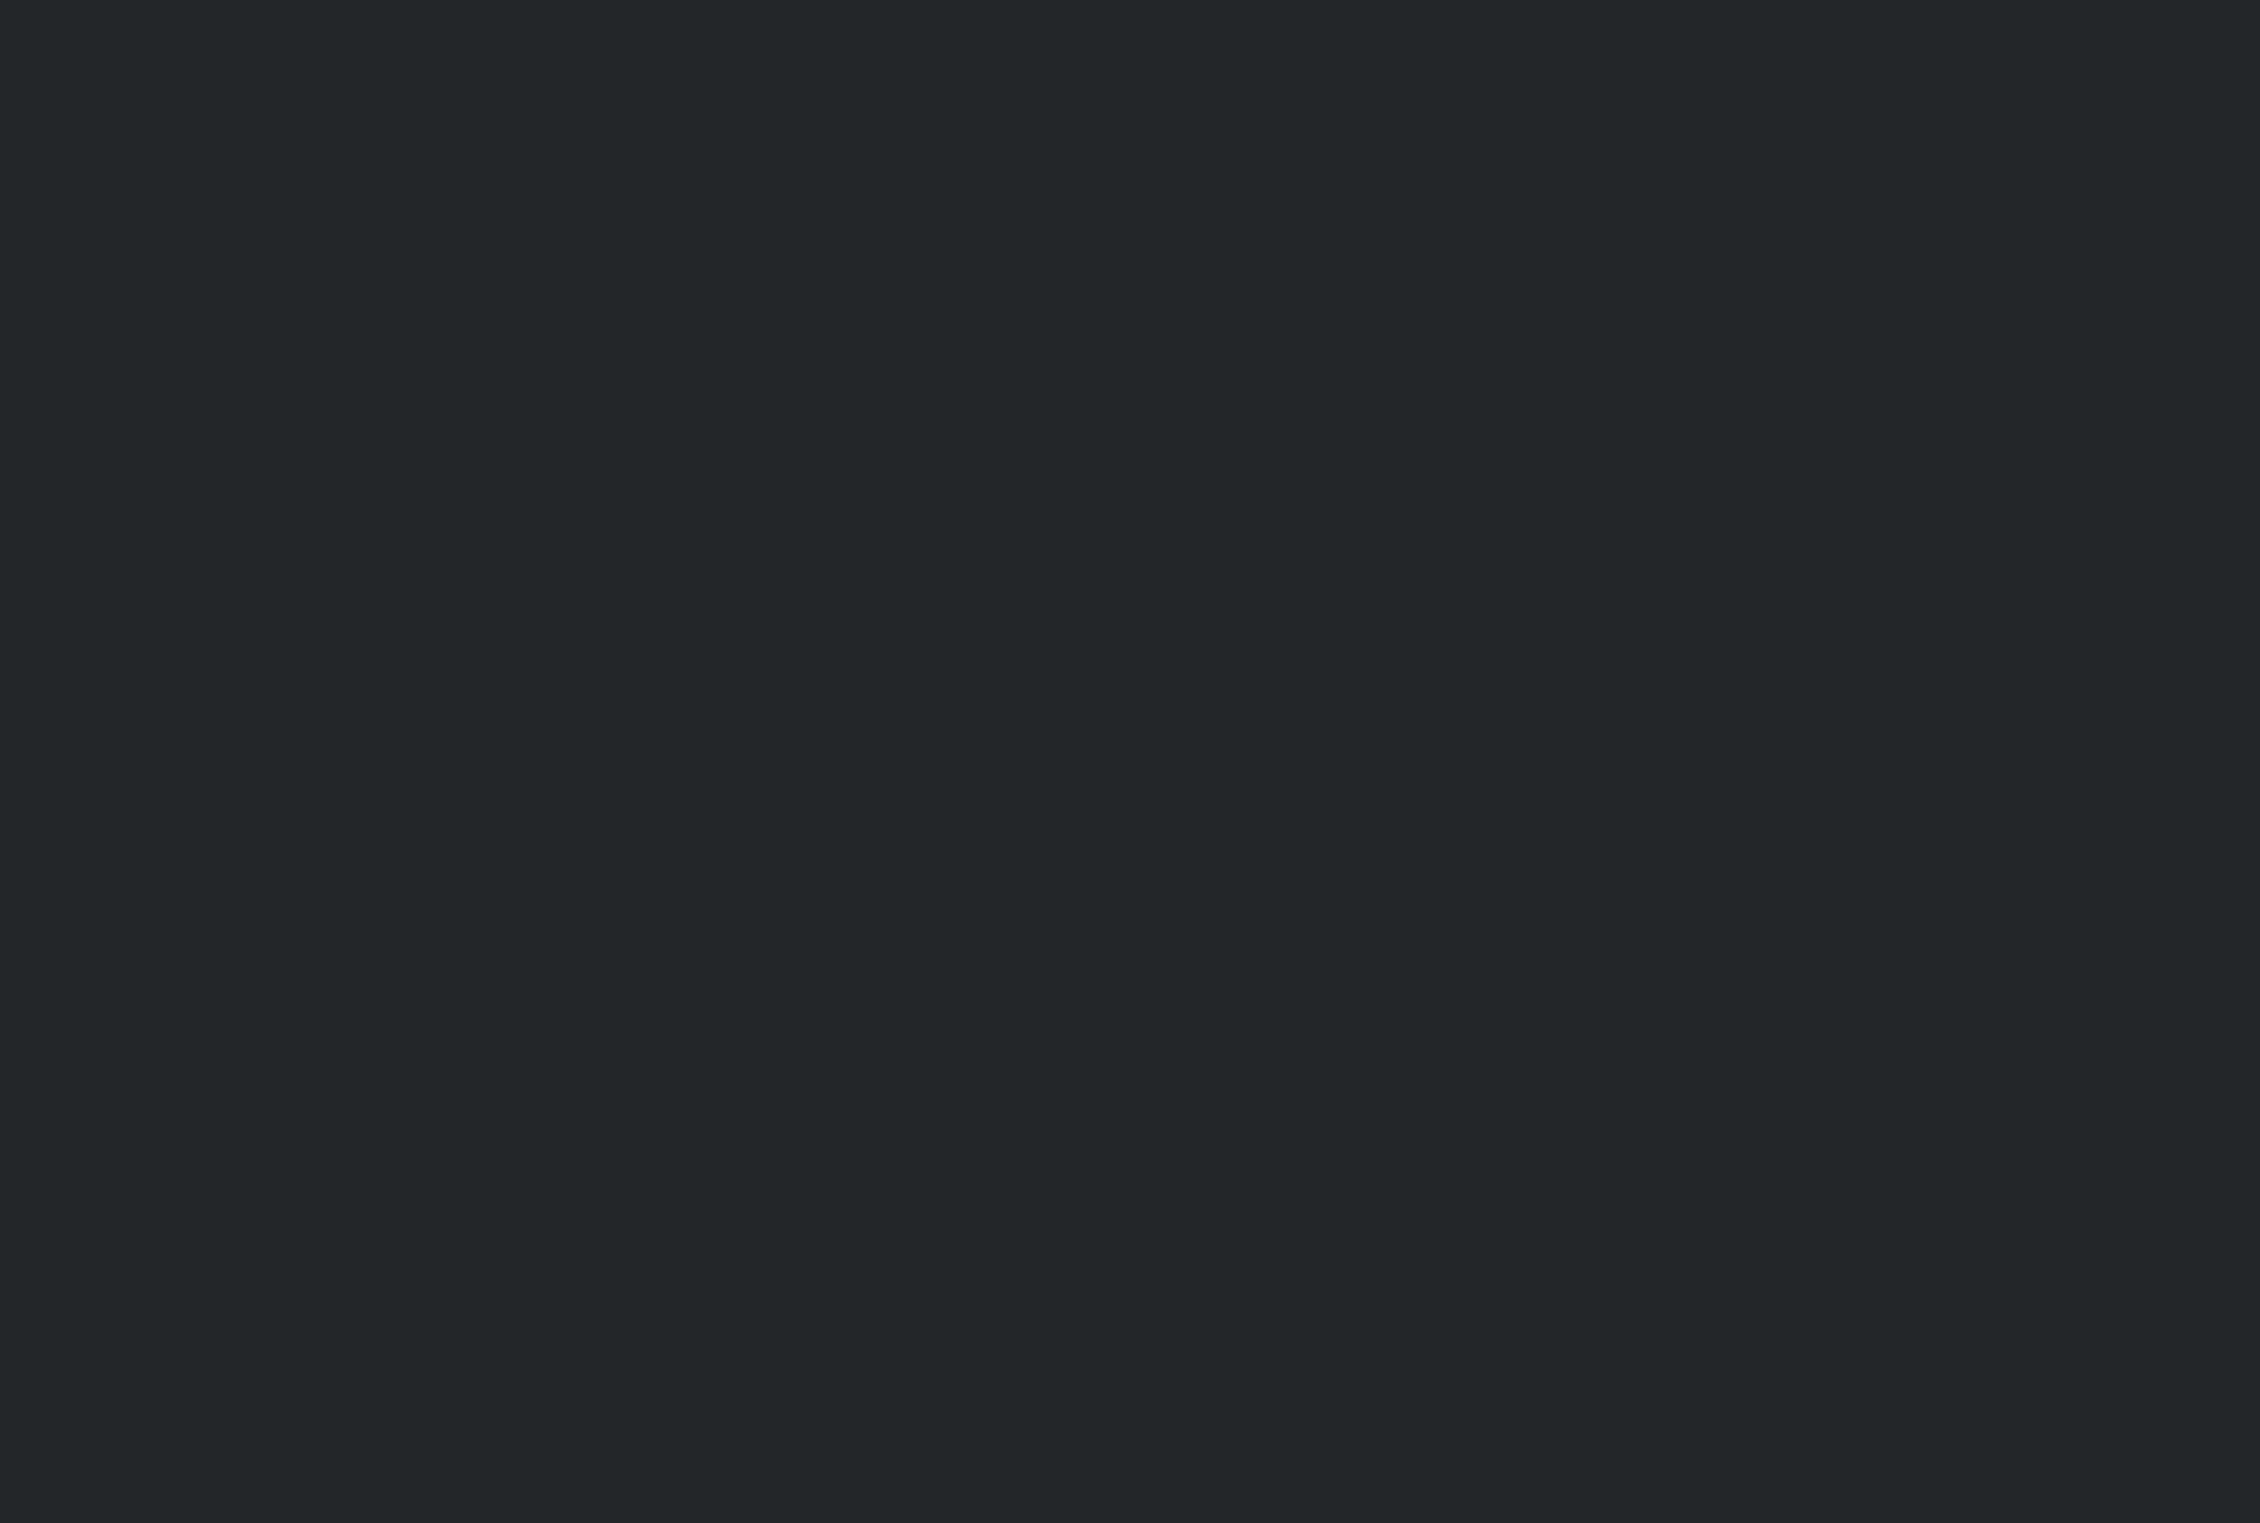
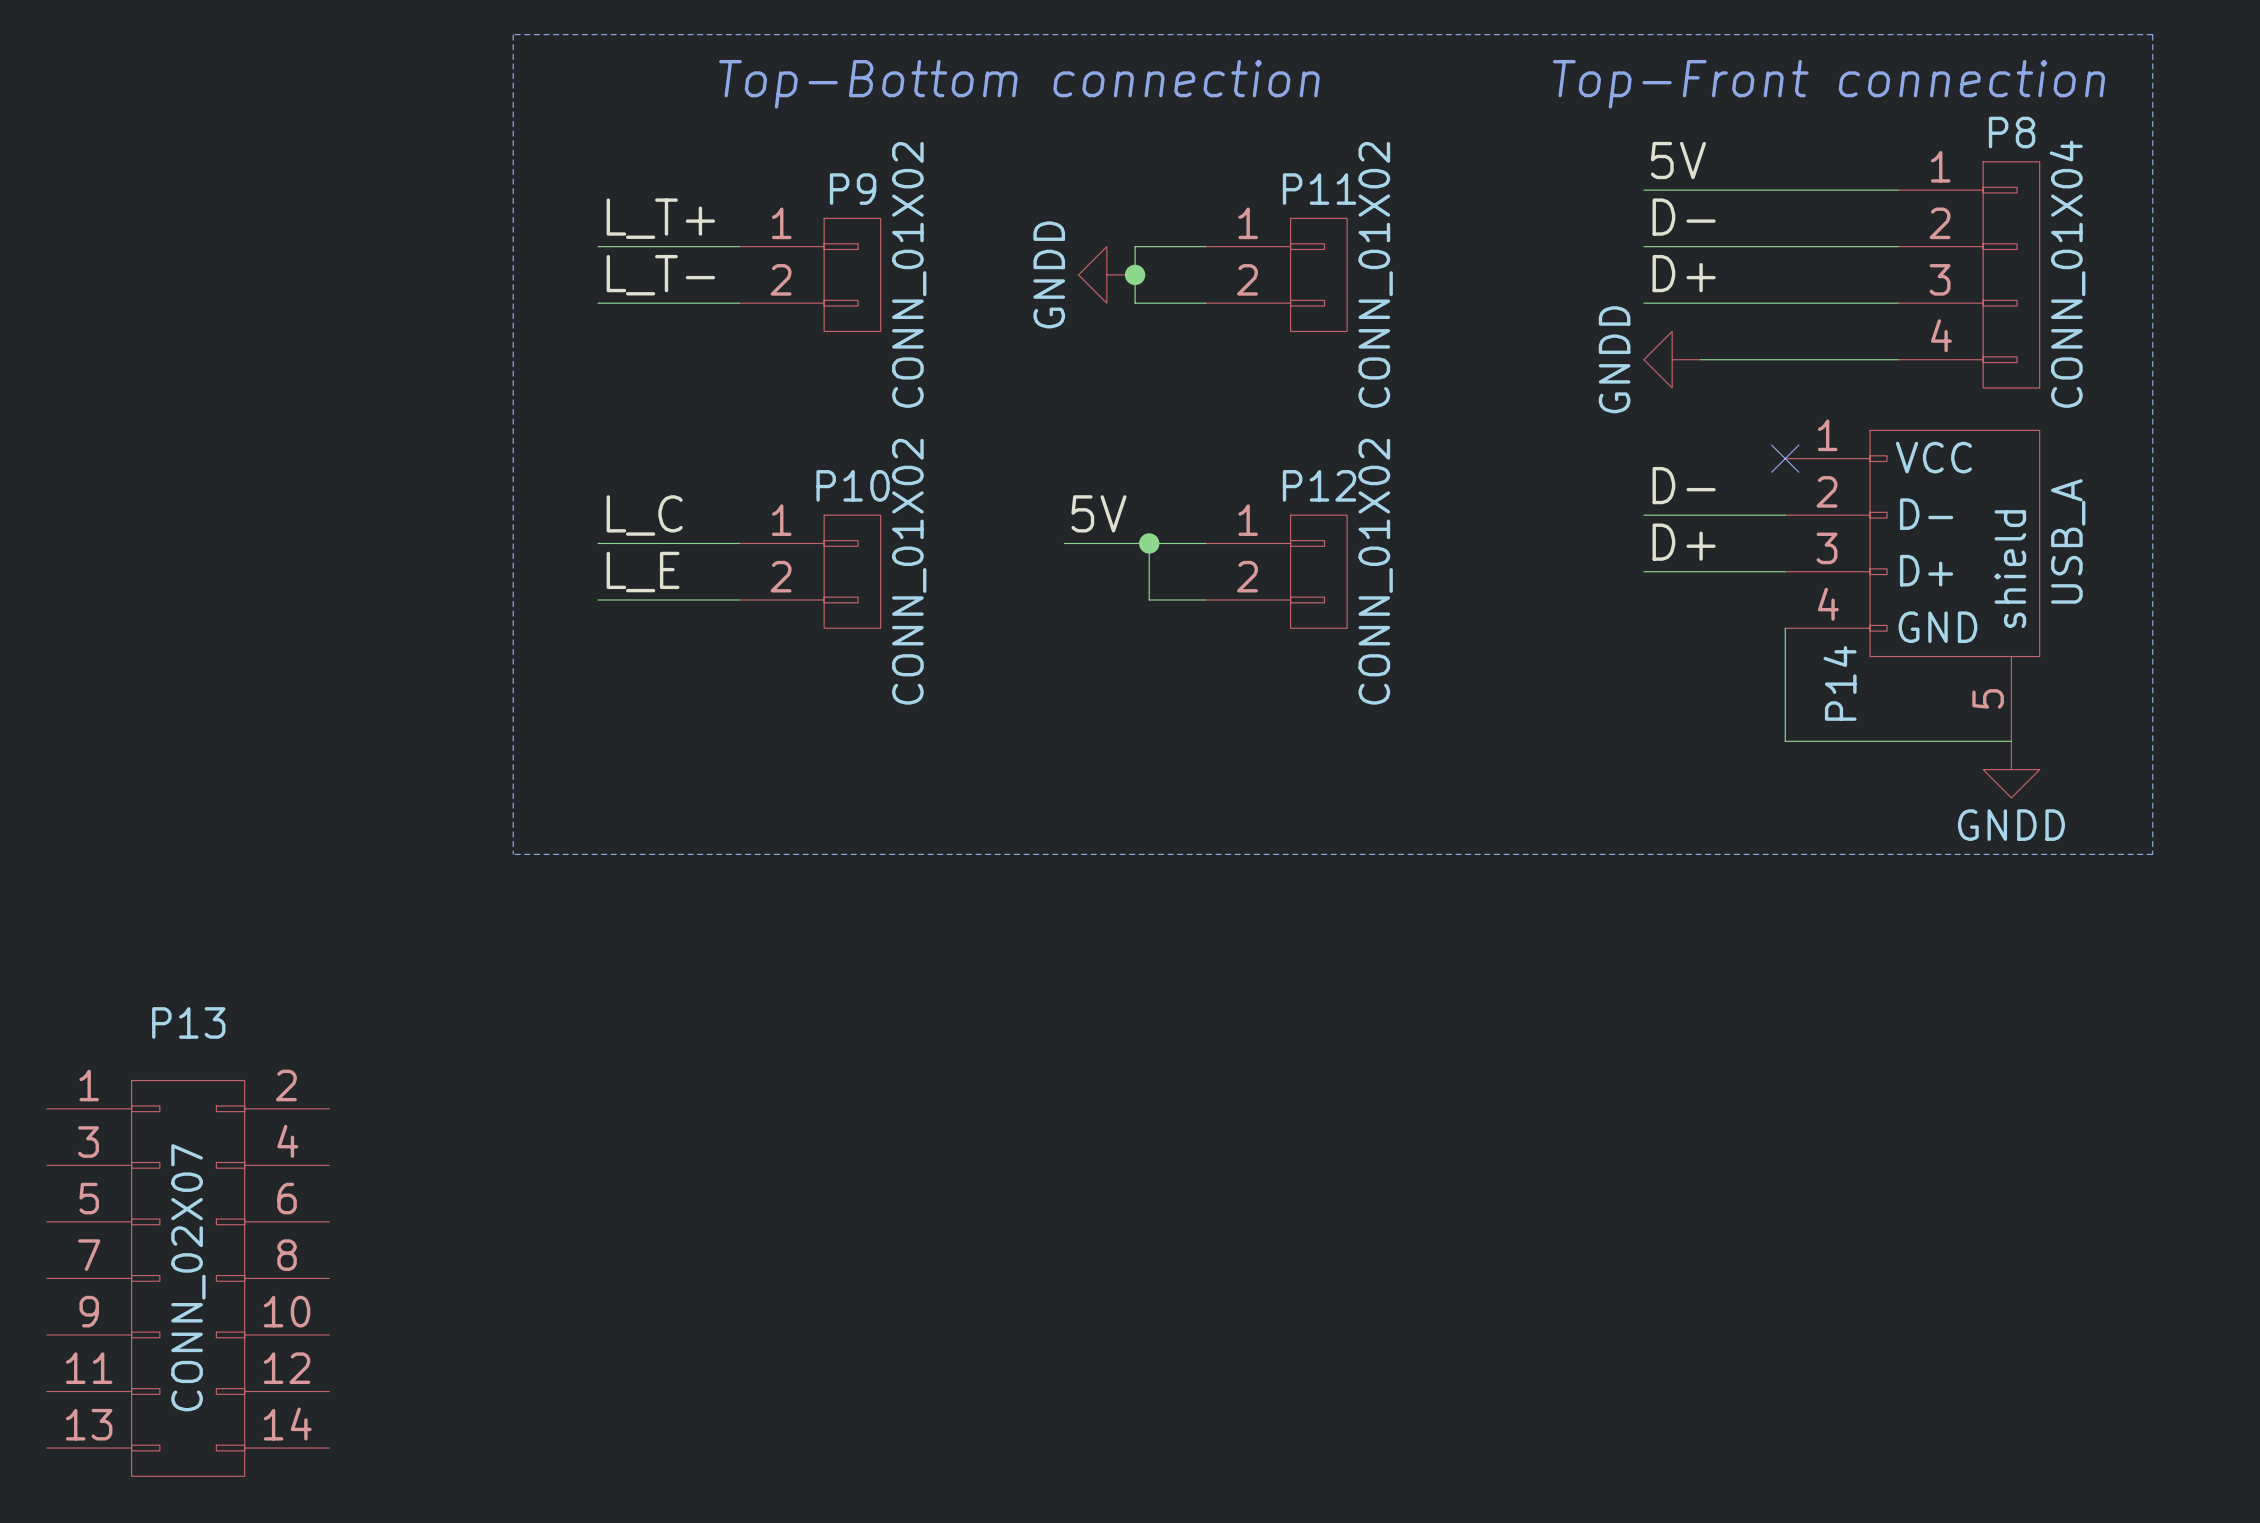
line: none -> (513, 34) (513, 854) (2152, 854) (2152, 34) (513, 34)
text: none -> Top-Bottom connection (1019, 84)
text: none -> Top-Front connection (1829, 84)
label: none -> 5V (1678, 160)
wire: none -> (1643, 190) (1898, 190)
label: none -> D- (1684, 217)
label: none -> L_T+ (660, 218)
wire: none -> (598, 246) (739, 246)
wire: none -> (1205, 246) (1135, 246) (1135, 303) (1205, 303)
wire: none -> (1643, 246) (1898, 246)
label: none -> D+ (1684, 273)
P9: none -> CONN_01X02 (810, 274)
power symbol: none -> GNDD (1106, 274)
junction: none -> (1135, 274)
P11: none -> CONN_01X02 (1276, 274)
P8: none -> CONN_01X04 (1969, 274)
label: none -> L_T- (660, 275)
wire: none -> (598, 303) (739, 303)
wire: none -> (1643, 303) (1898, 303)
power symbol: none -> GNDD (1672, 359)
wire: none -> (1700, 359) (1898, 359)
no-connect mark: none -> (1785, 458)
label: none -> D- (1684, 485)
label: none -> 5V (1098, 513)
label: none -> L_C (644, 515)
wire: none -> (1643, 515) (1785, 515)
label: none -> D+ (1684, 542)
wire: none -> (598, 543) (739, 543)
wire: none -> (1064, 543) (1205, 543)
wire: none -> (1149, 543) (1149, 599) (1205, 599)
junction: none -> (1149, 543)
P10: none -> CONN_01X02 (810, 571)
P12: none -> CONN_01X02 (1276, 571)
wire: none -> (1643, 571) (1785, 571)
label: none -> L_E (643, 572)
P14: none -> USB_A (1912, 585)
wire: none -> (598, 599) (739, 599)
wire: none -> (1785, 628) (1785, 741) (2011, 741)
power symbol: none -> GNDD (2011, 769)
P13: none -> CONN_02X07 (188, 1278)

